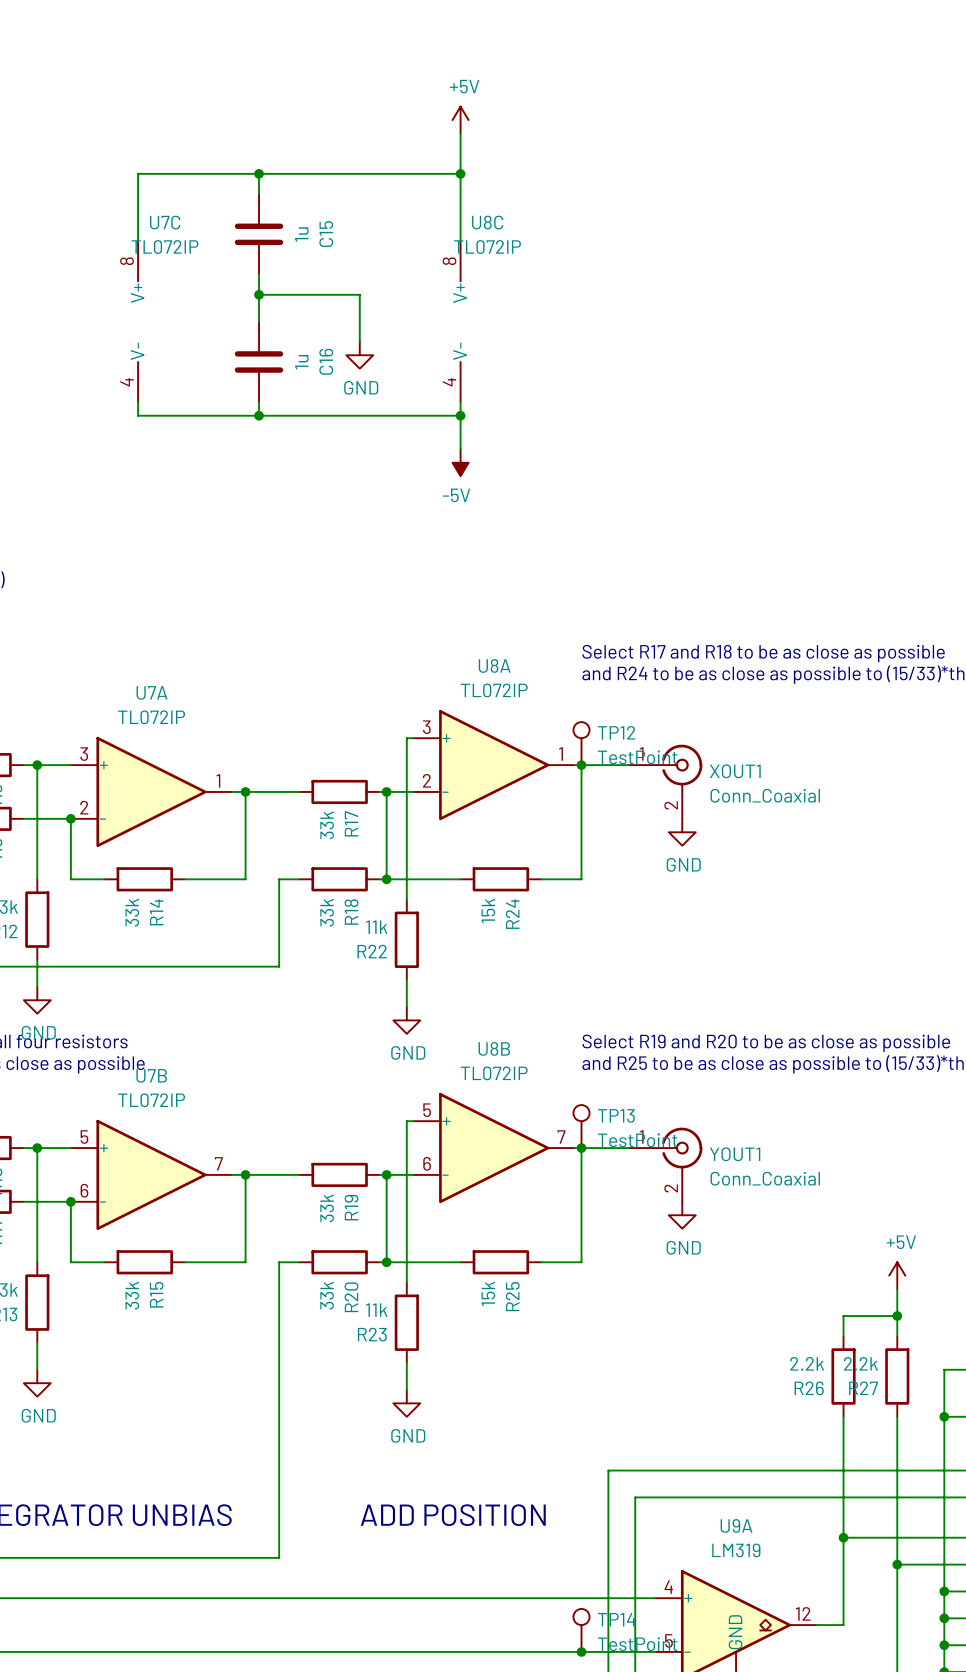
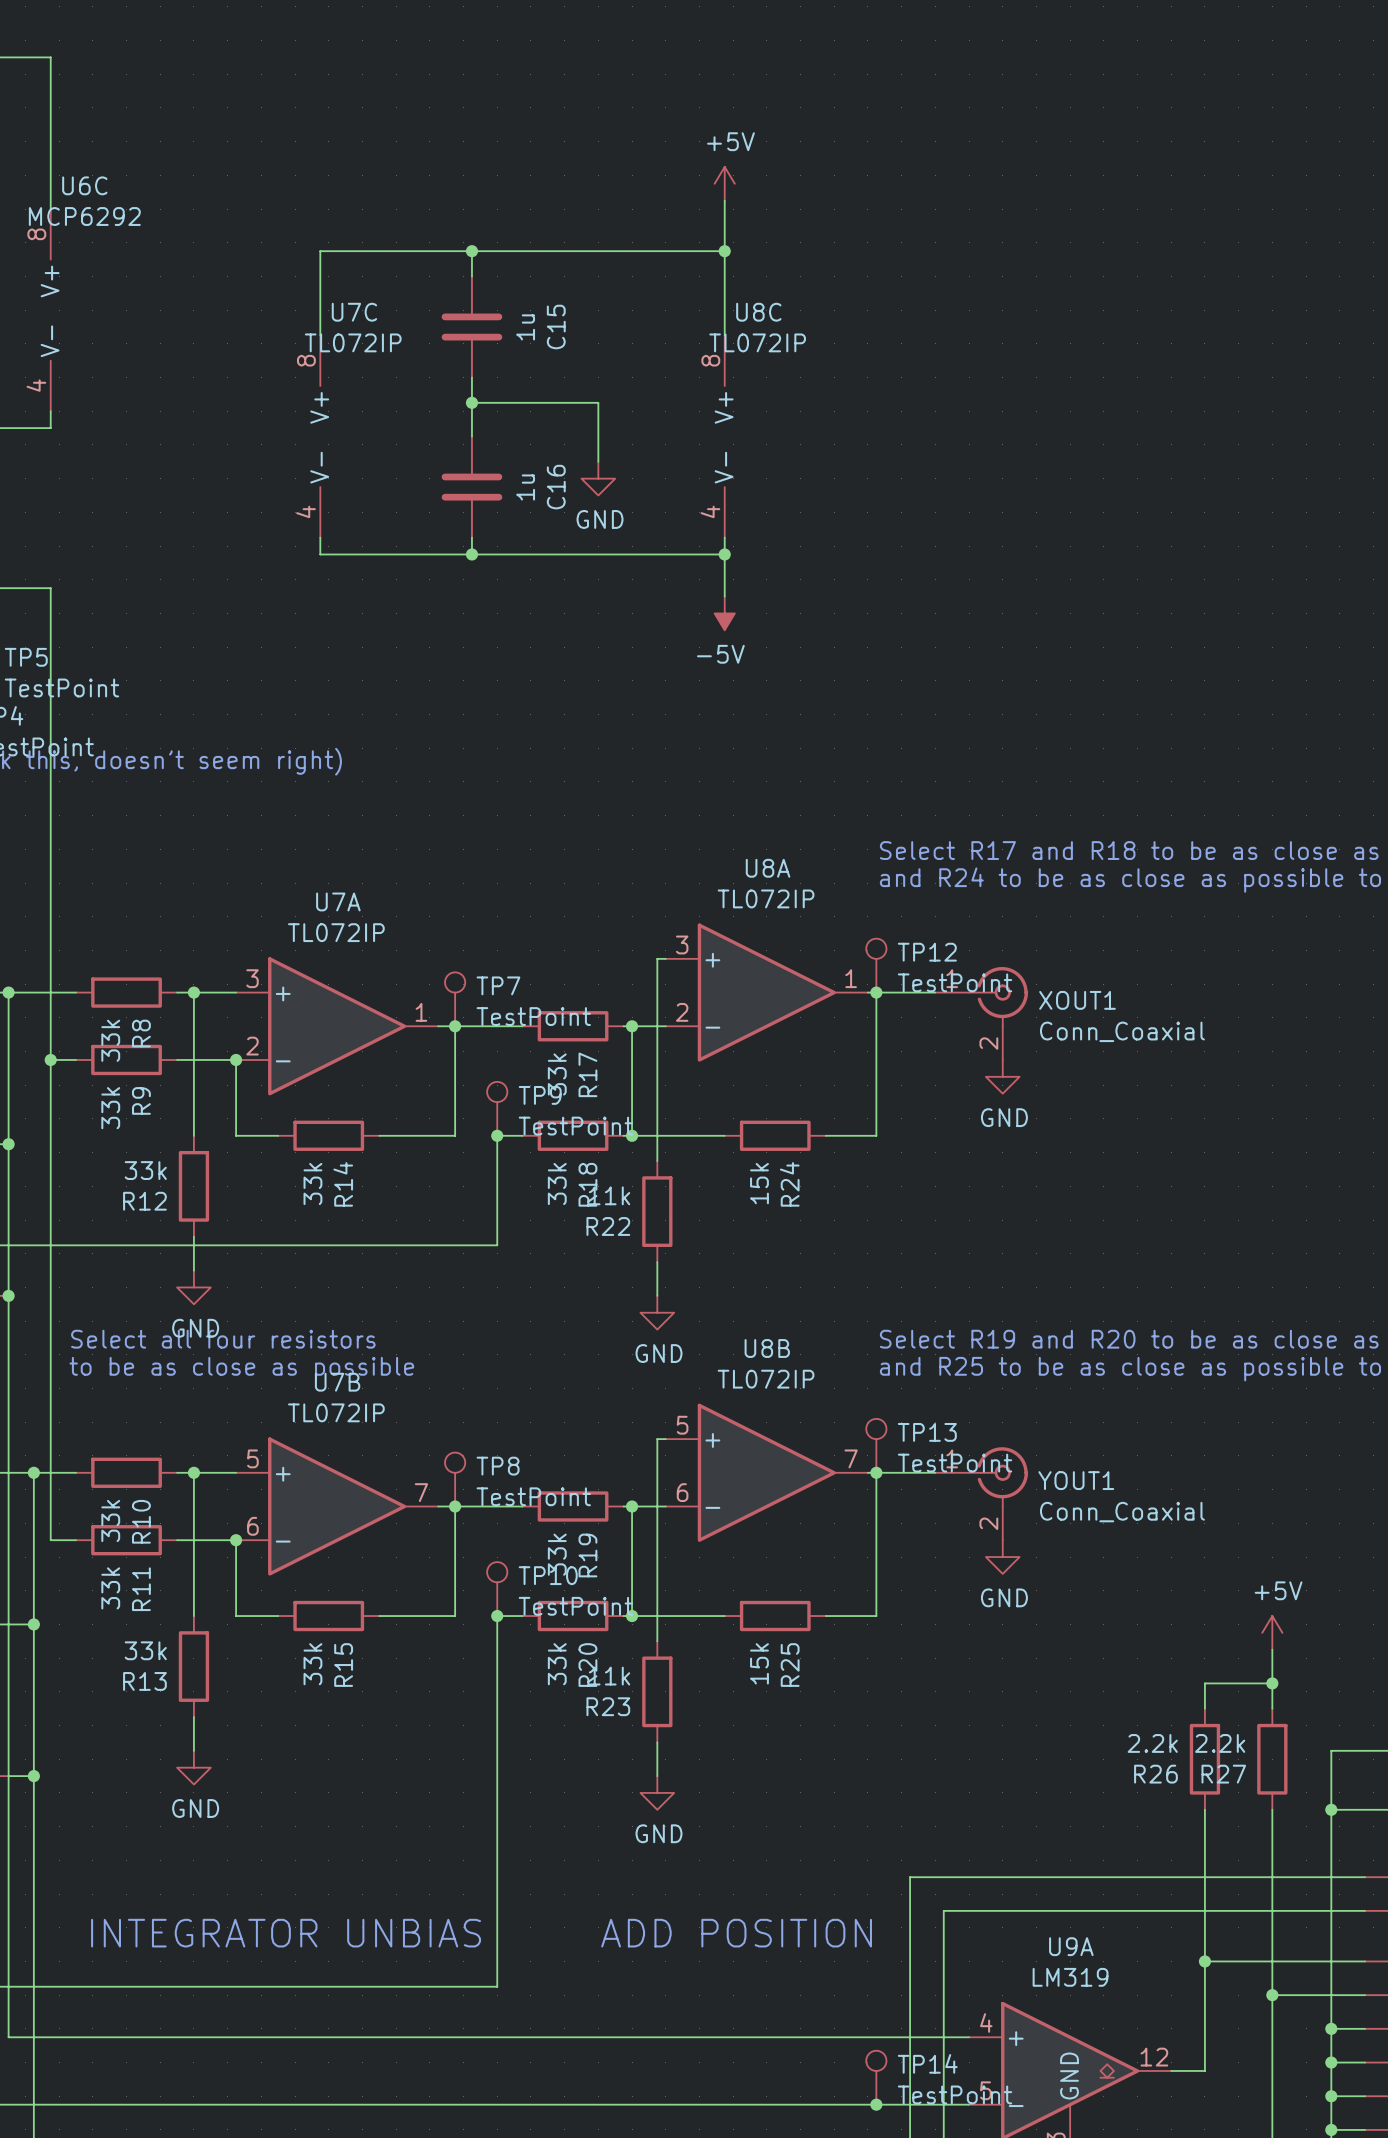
TP7: none -> TestPoint (455, 999)
TP9: none -> TestPoint (497, 1108)
junction: none -> (497, 1135)
TP8: none -> TestPoint (455, 1479)
TP10: none -> TestPoint (497, 1589)
junction: none -> (497, 1616)

